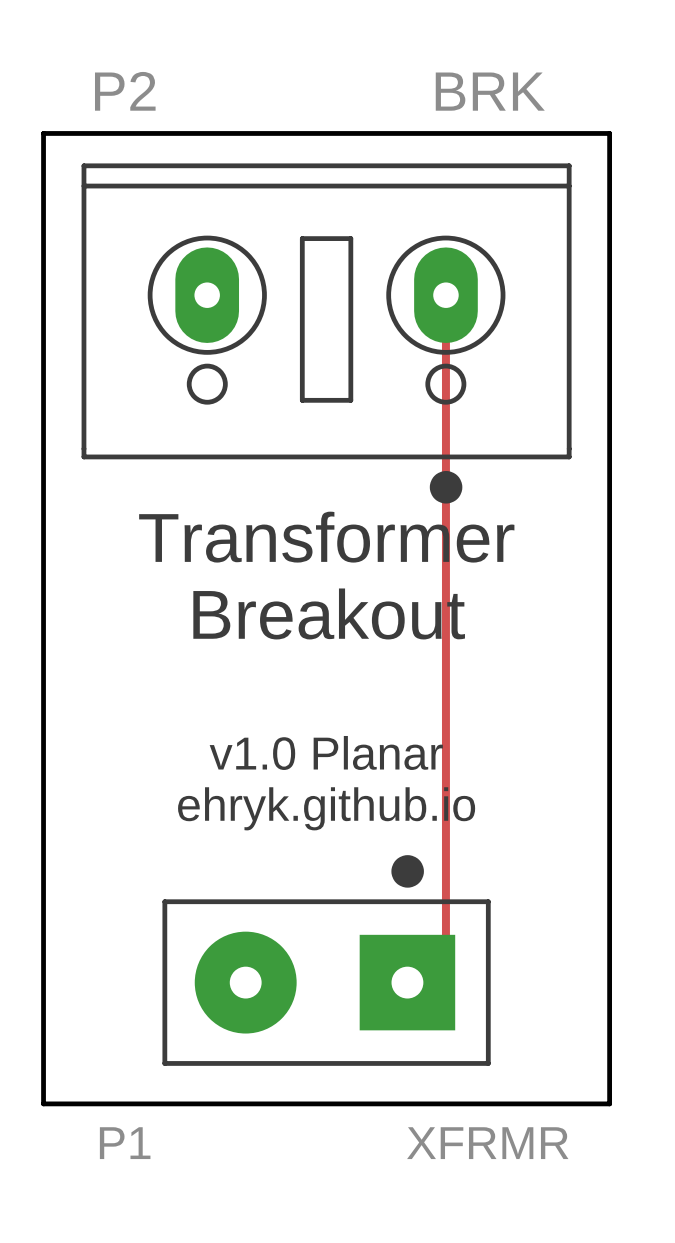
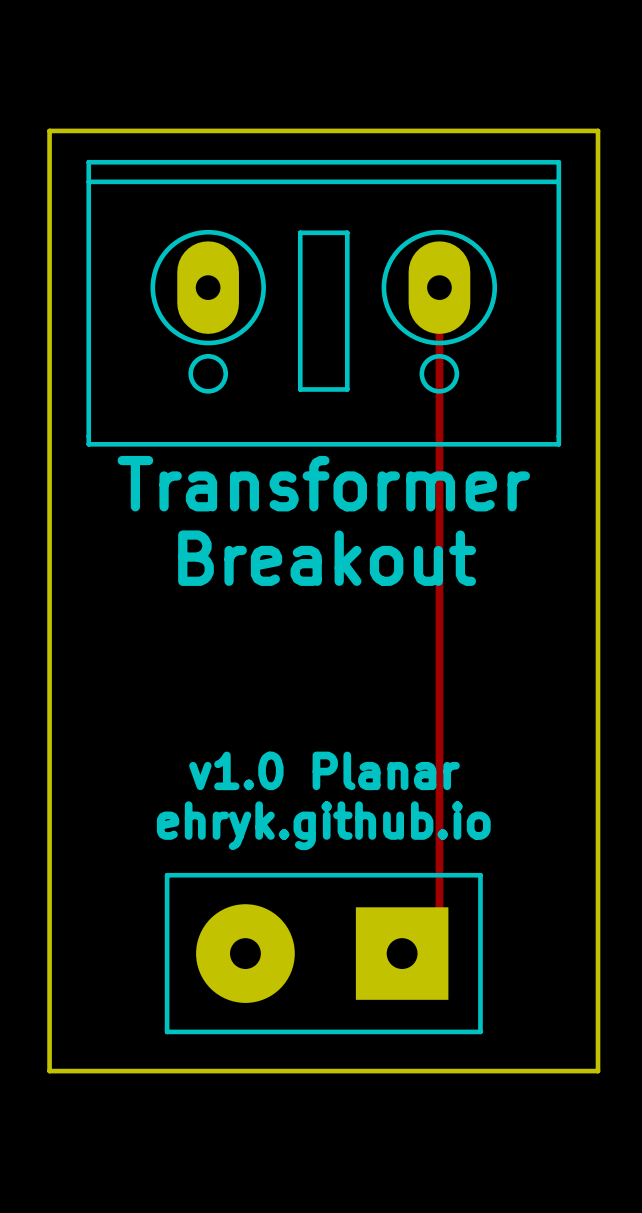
P2 name: P2 (125, 91) -> none
P2 value: BRK (490, 91) -> none
drawing: [429, 471, 463, 504] -> none
text position: Transformer (326, 537) -> Transformer (323, 483)
text position: Breakout (329, 613) -> Breakout (327, 558)
text position: v1.0 Planar (326, 752) -> v1.0 Planar (324, 770)
text position: ehryk.github.io (326, 808) -> ehryk.github.io (323, 825)
drawing: [391, 855, 424, 888] -> none
P1 name: P1 (125, 1143) -> none
P1 value: XFRMR (487, 1143) -> none

